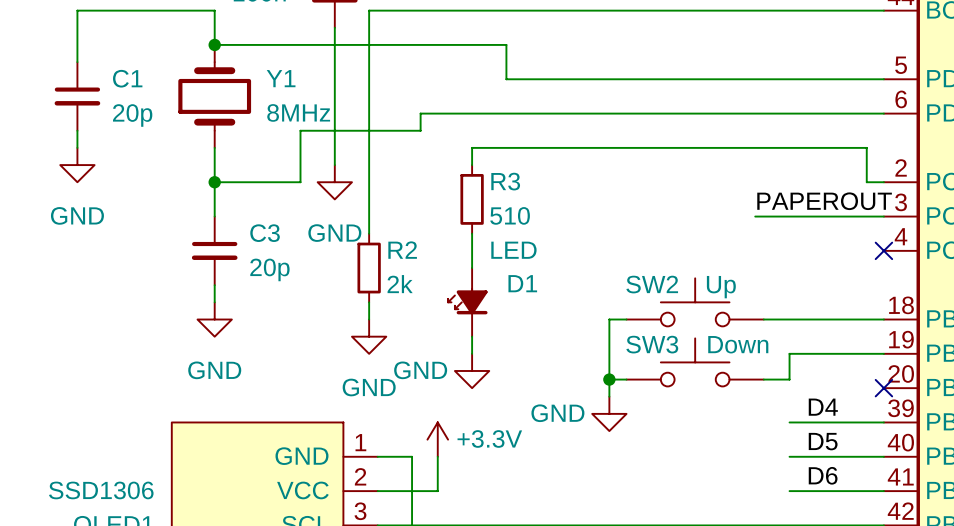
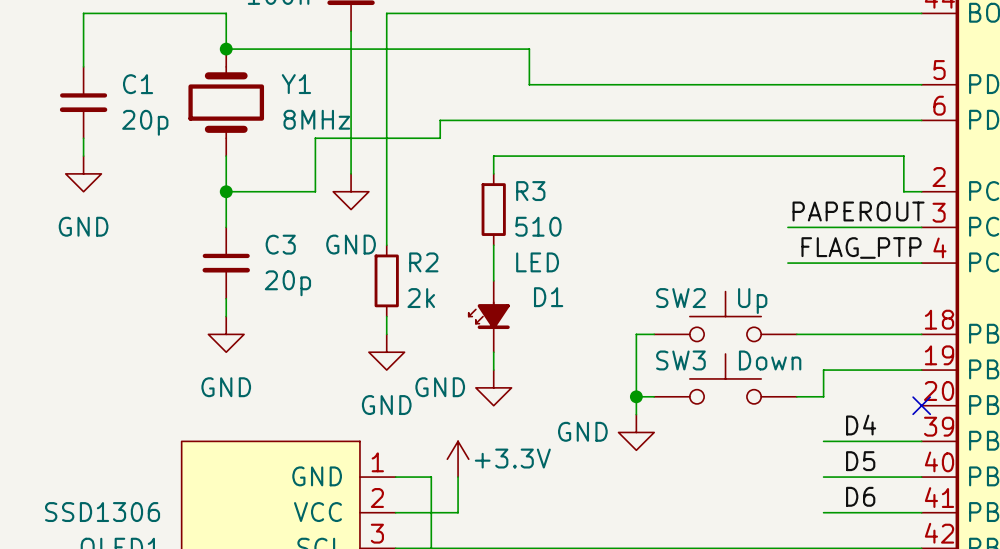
label: none -> FLAG_PTP (861, 248)
wire: none -> (787, 263) (921, 263)
no-connect mark: (883, 250) -> none

